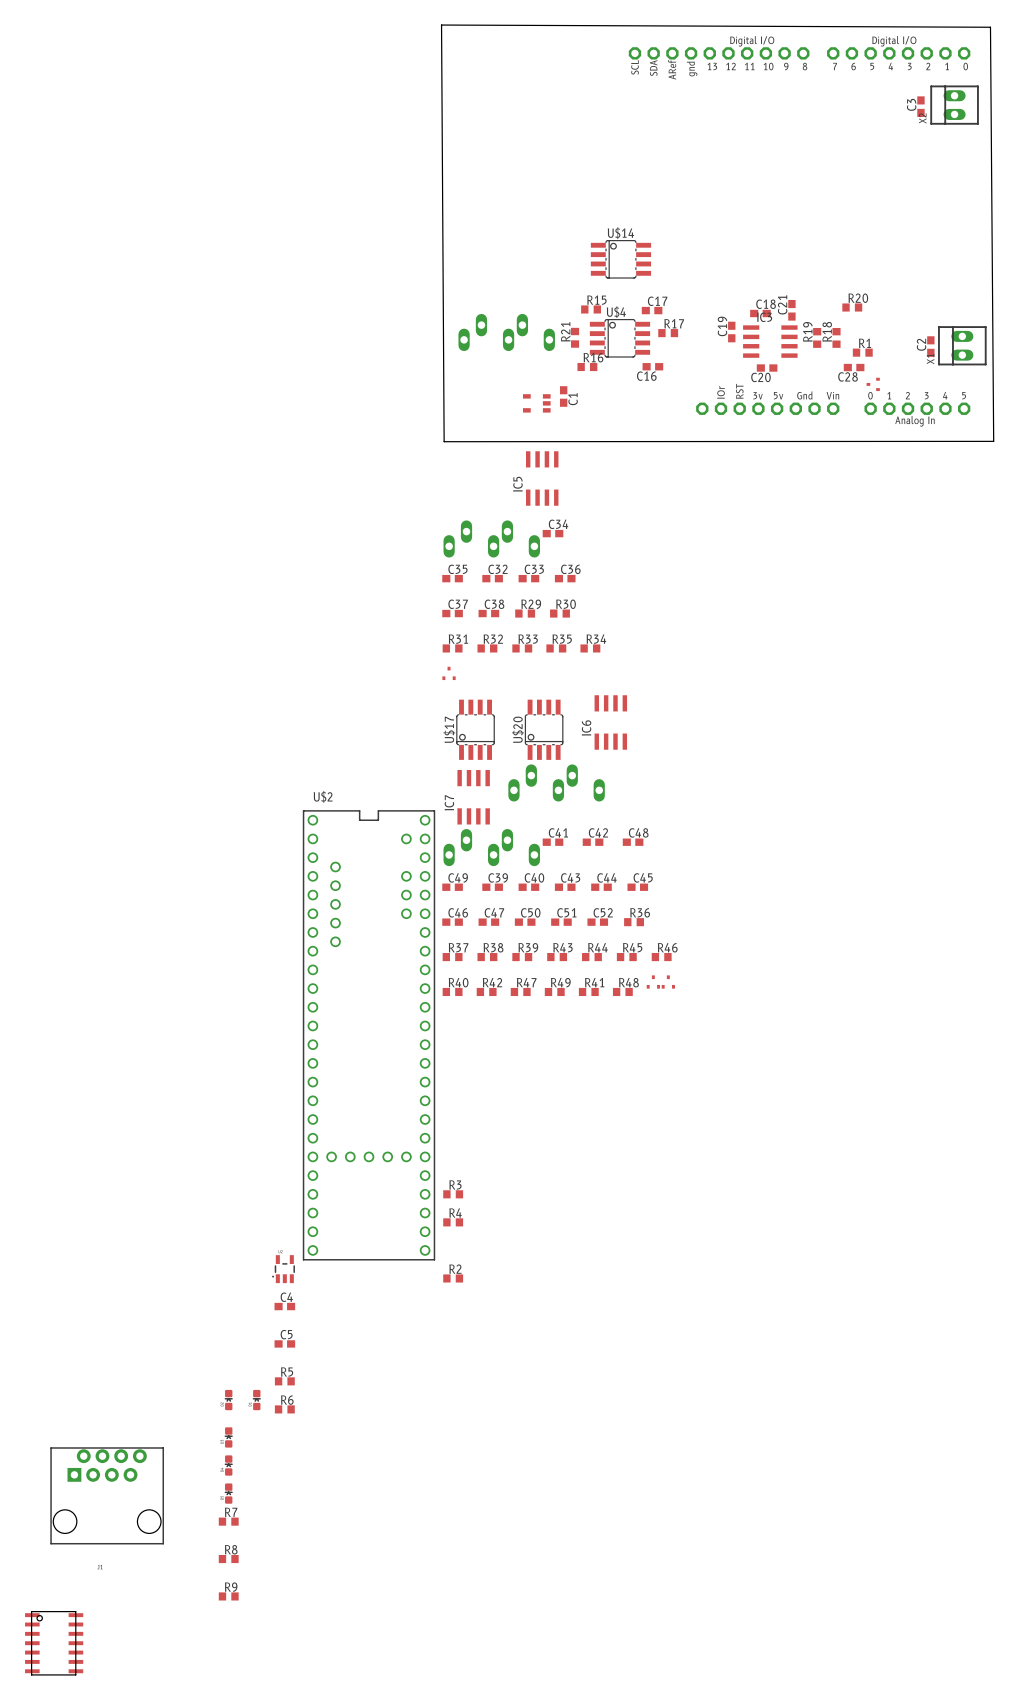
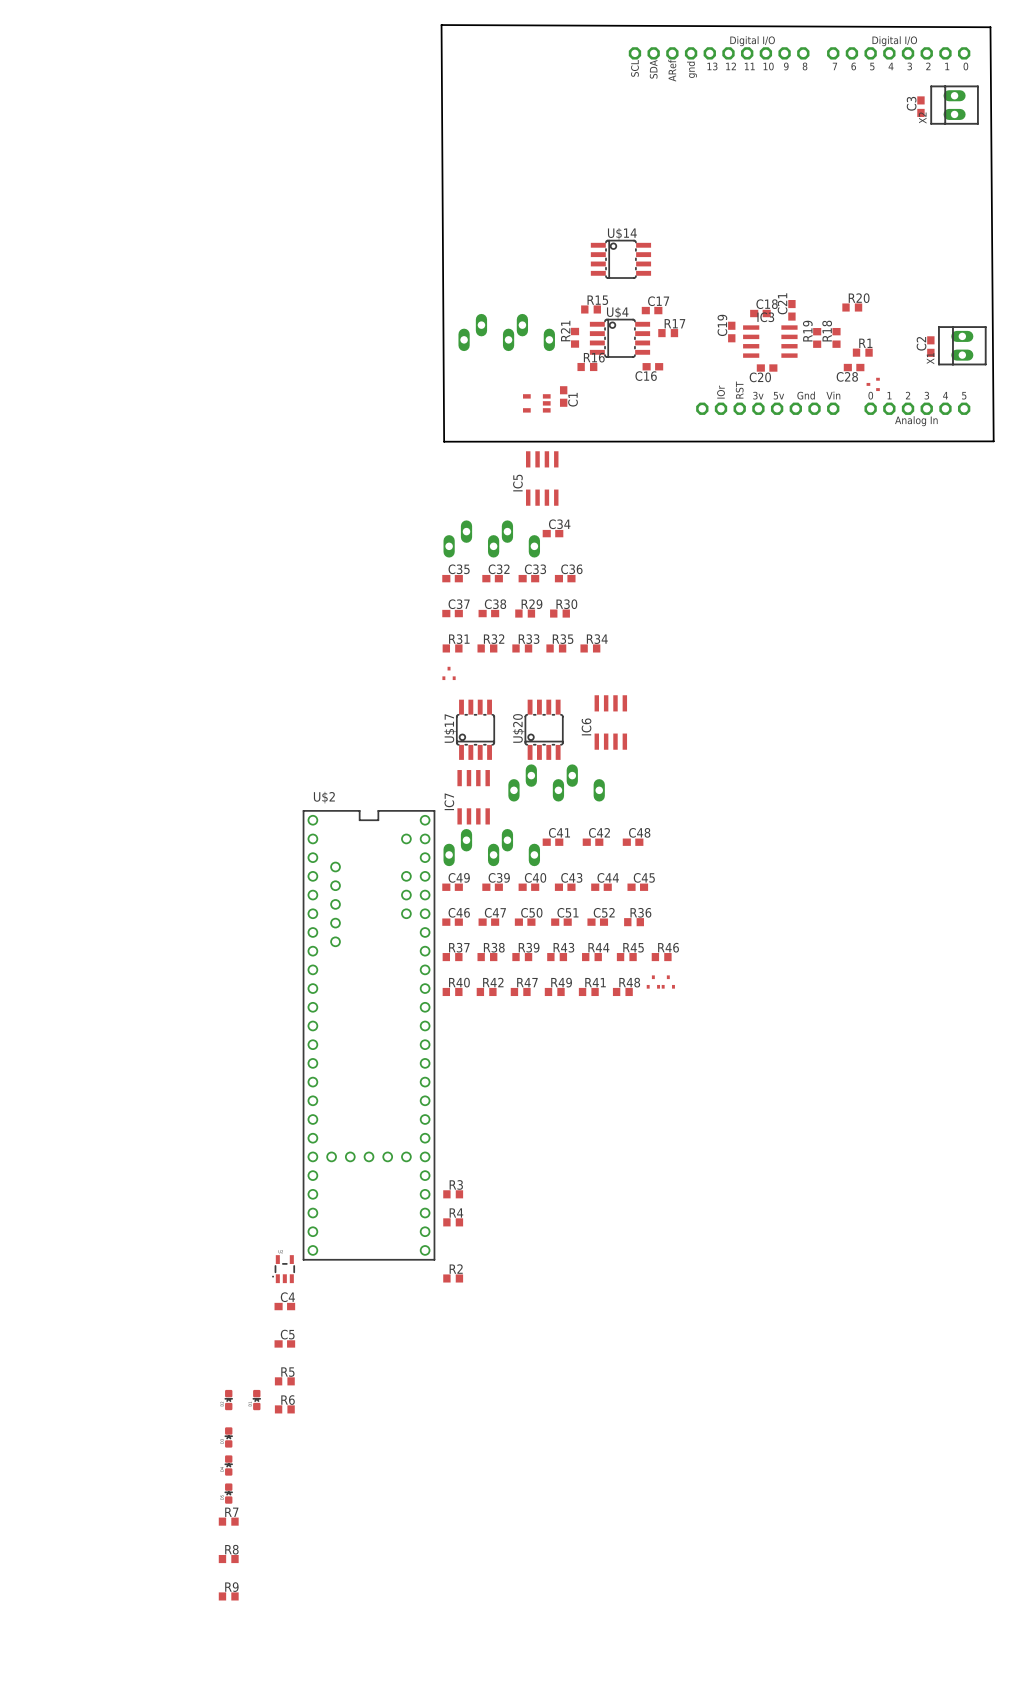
part: (107, 1495) -> none
part: (54, 1643) -> none

